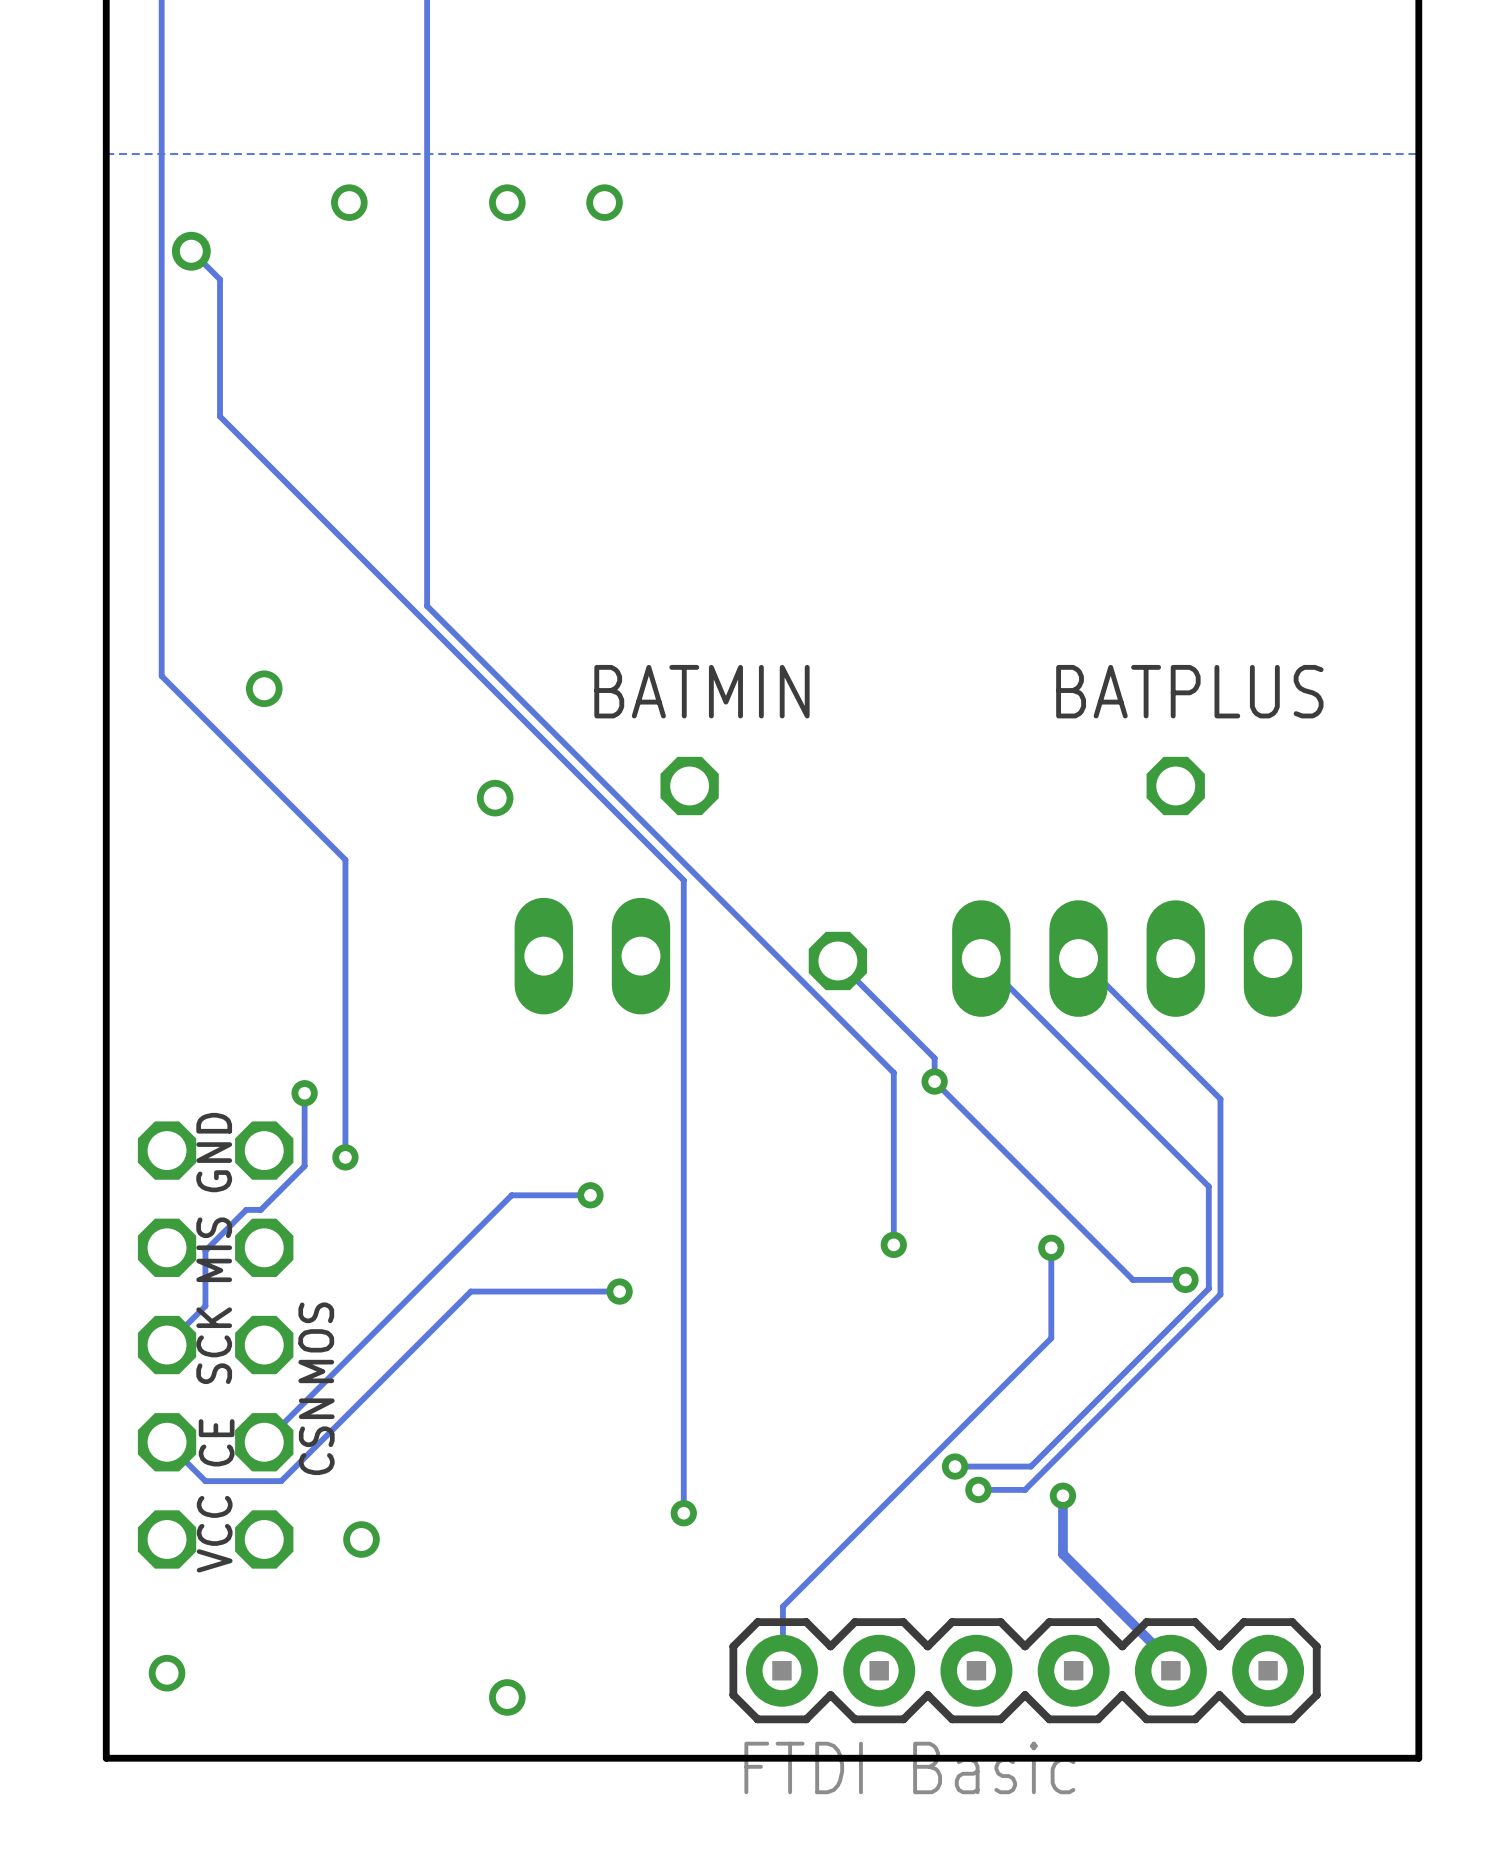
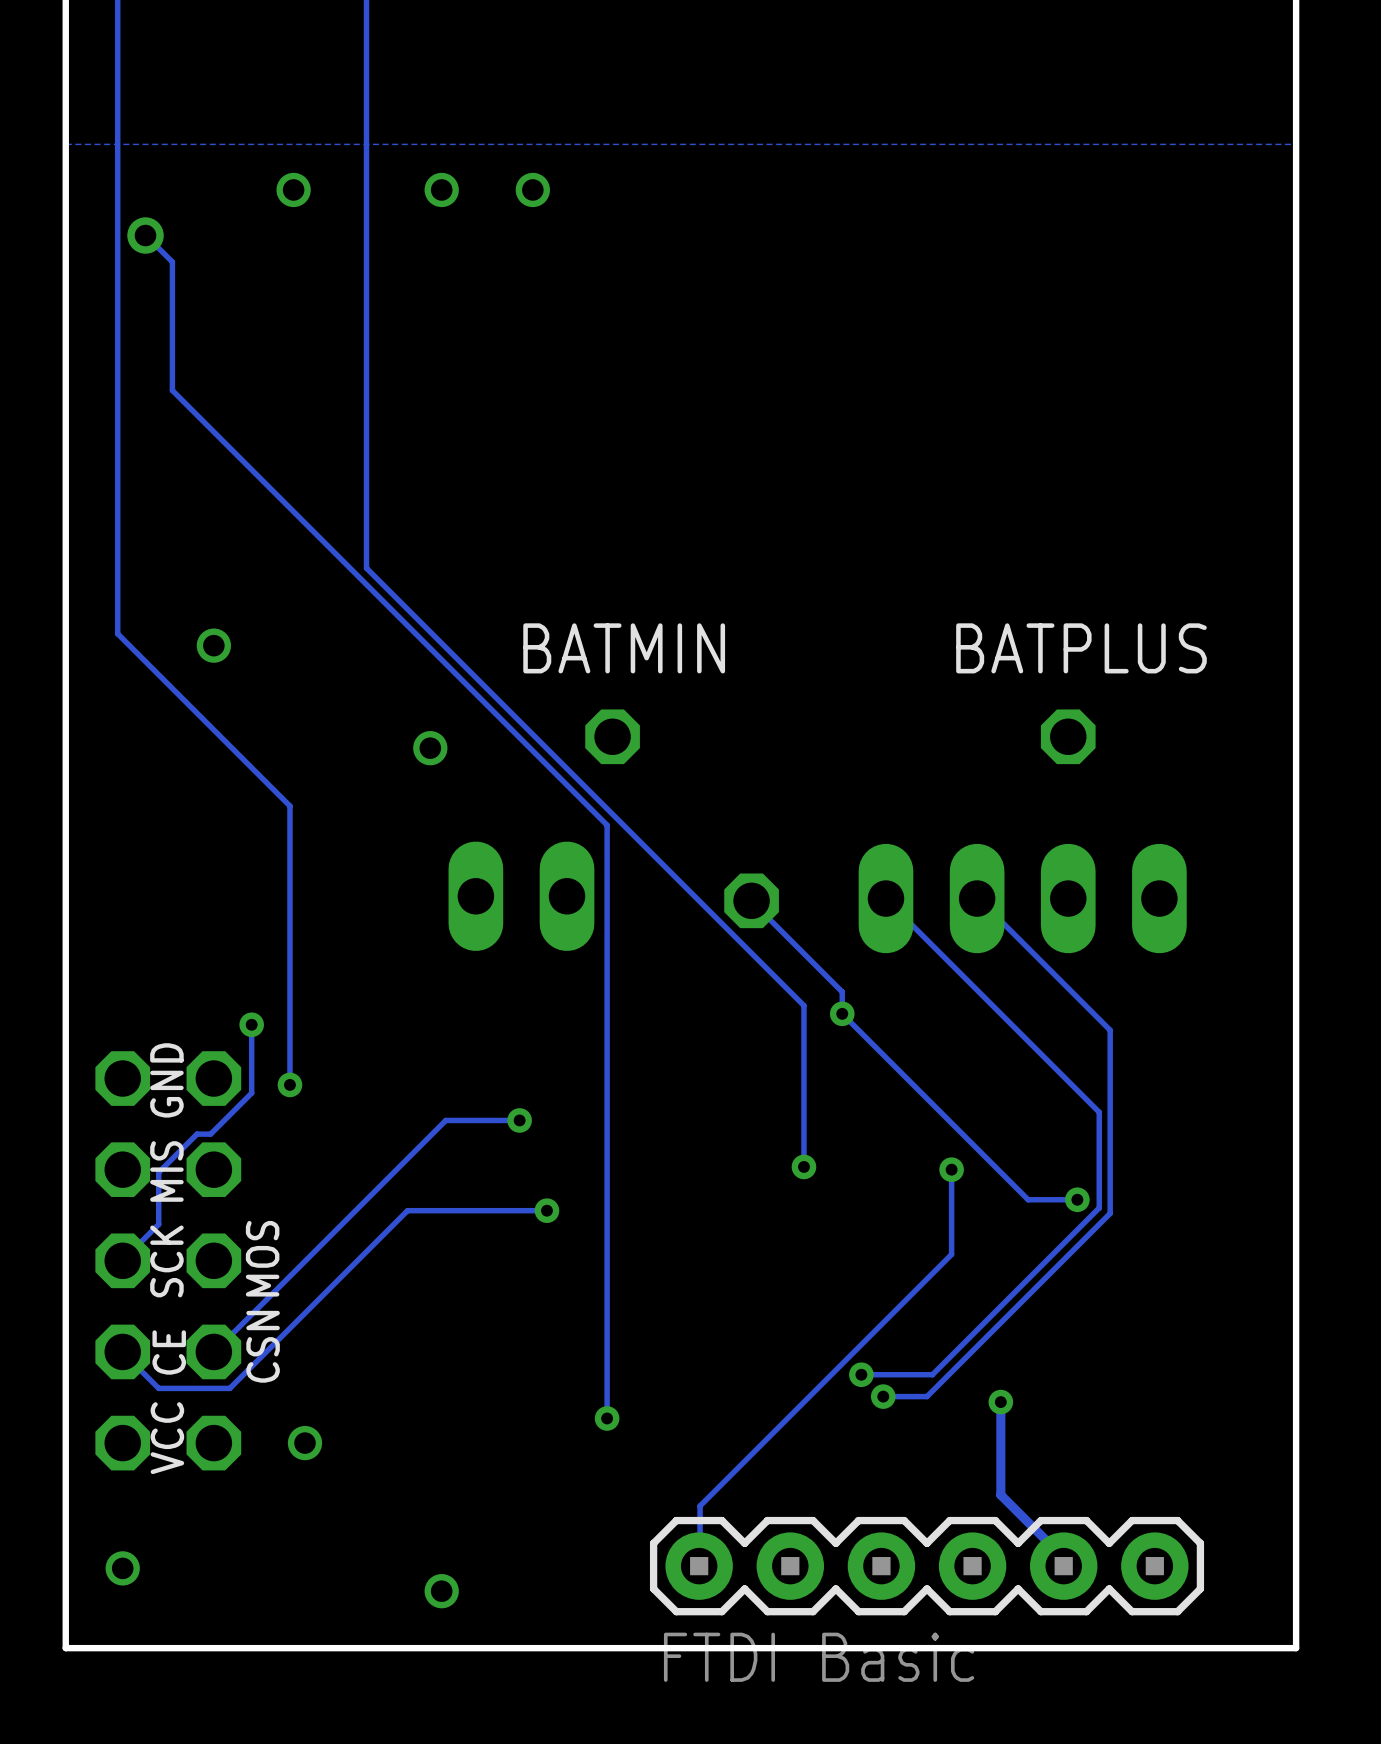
track: (1062, 1495) (1062, 1554) (1103, 1594) -> (1000, 1402) (1000, 1495)
via position: (1062, 1495) -> (1000, 1402)

